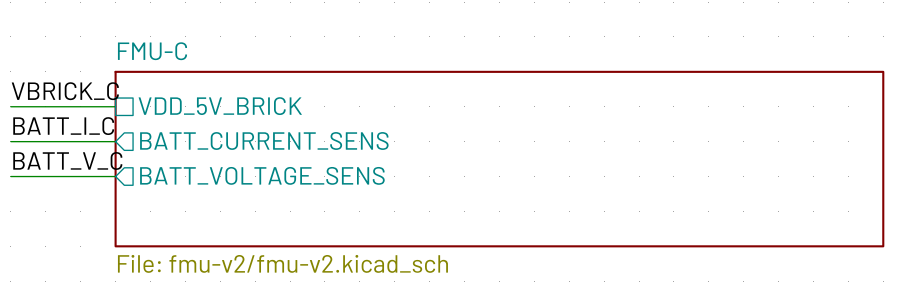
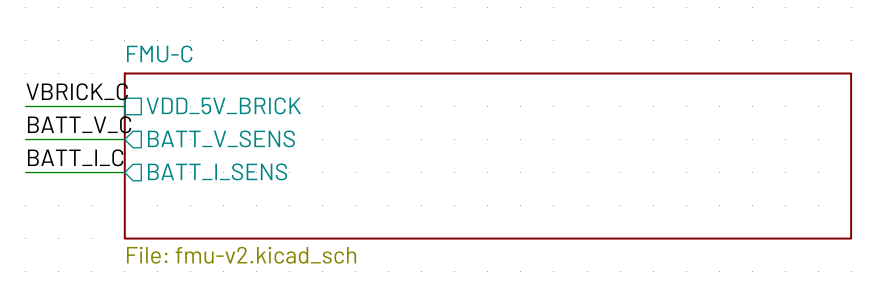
label: BATT_I_C (63, 126) -> BATT_V_C (79, 124)
sheet pin: BATT_CURRENT_SENS (264, 141) -> BATT_V_SENS (221, 138)
label: BATT_V_C (67, 160) -> BATT_I_C (75, 157)
sheet pin: BATT_VOLTAGE_SENS (262, 175) -> BATT_I_SENS (217, 171)
sheet FMU-C value: File: fmu-v2/fmu-v2.kicad_sch (282, 263) -> File: fmu-v2.kicad_sch (241, 255)

